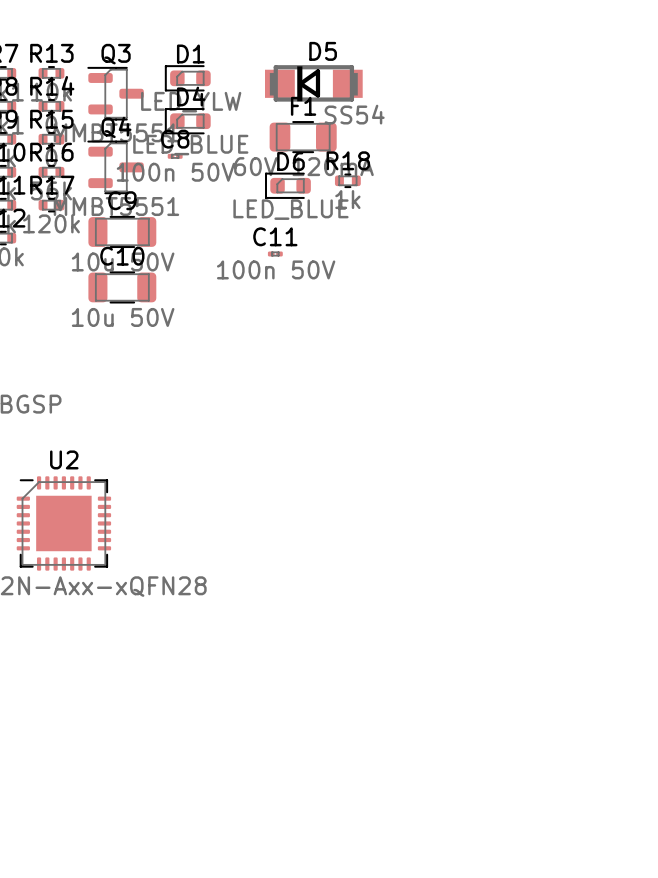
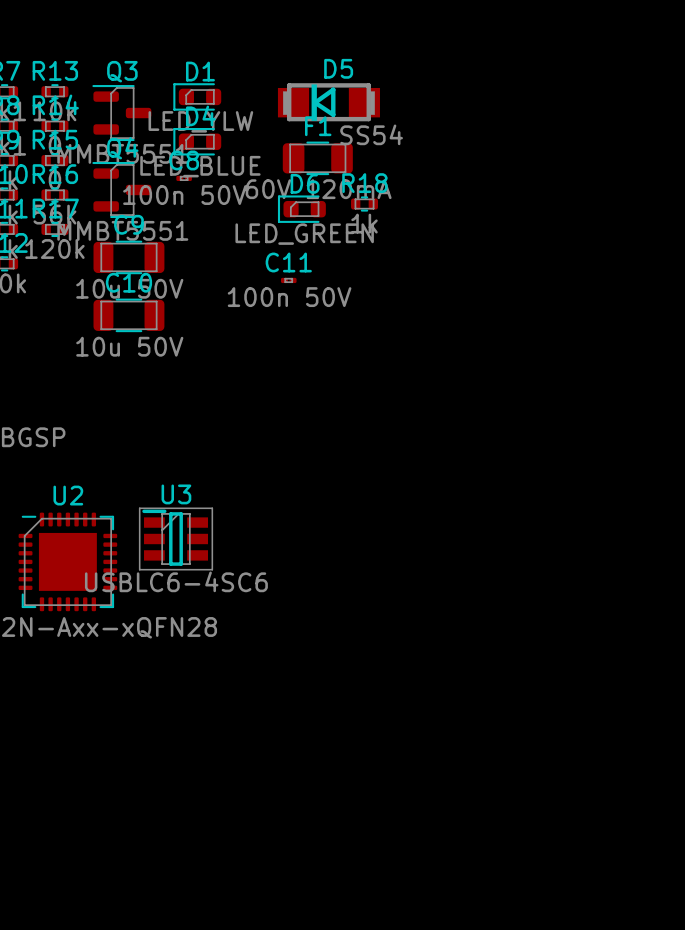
D6 value: LED_BLUE (290, 209) -> LED_GREEN (304, 234)
U3: none -> USBLC6-4SC6 (176, 538)

